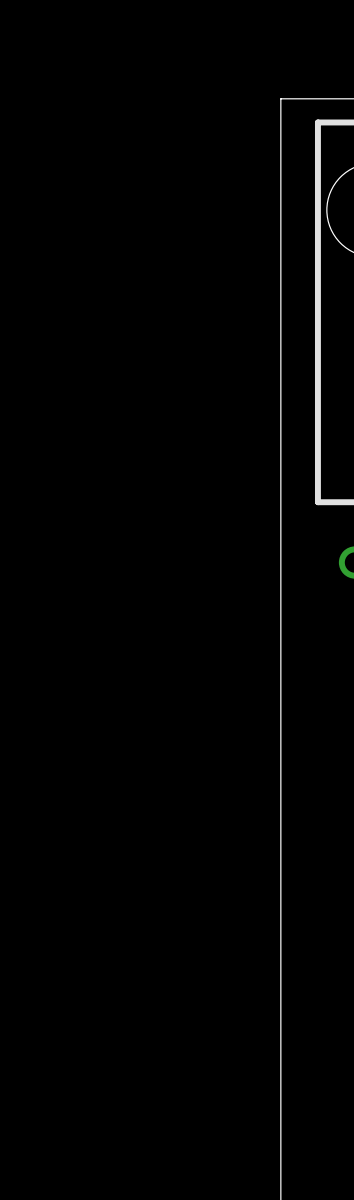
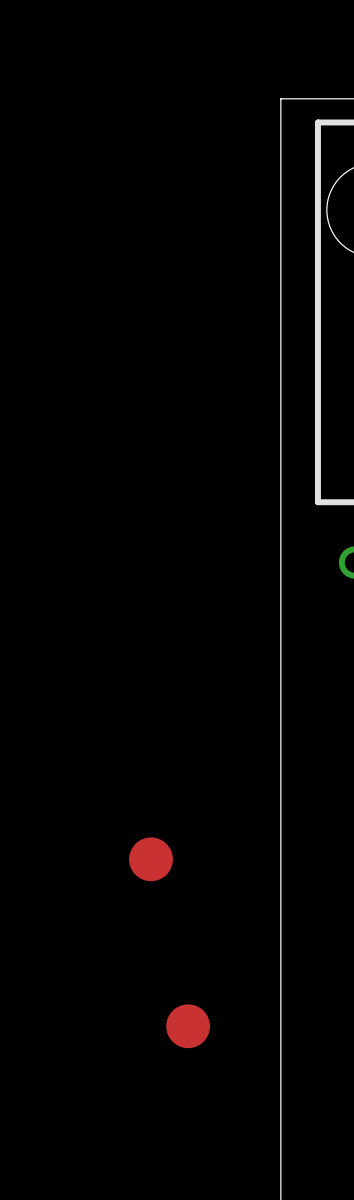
part: none -> (151, 859)
part: none -> (188, 1026)

